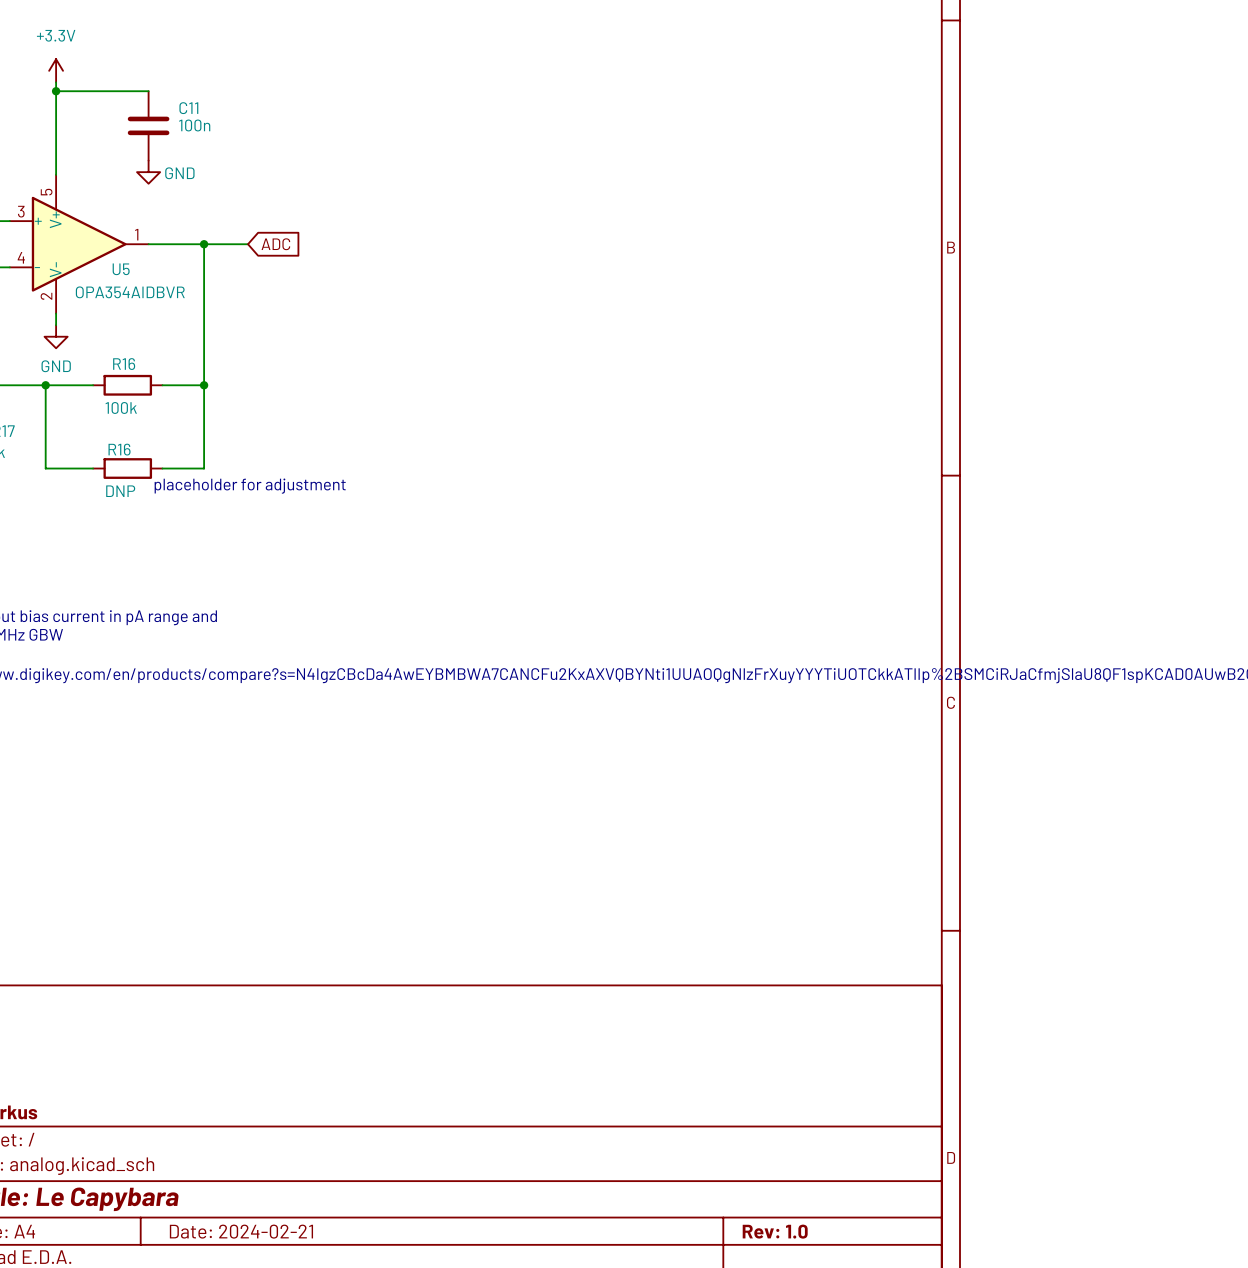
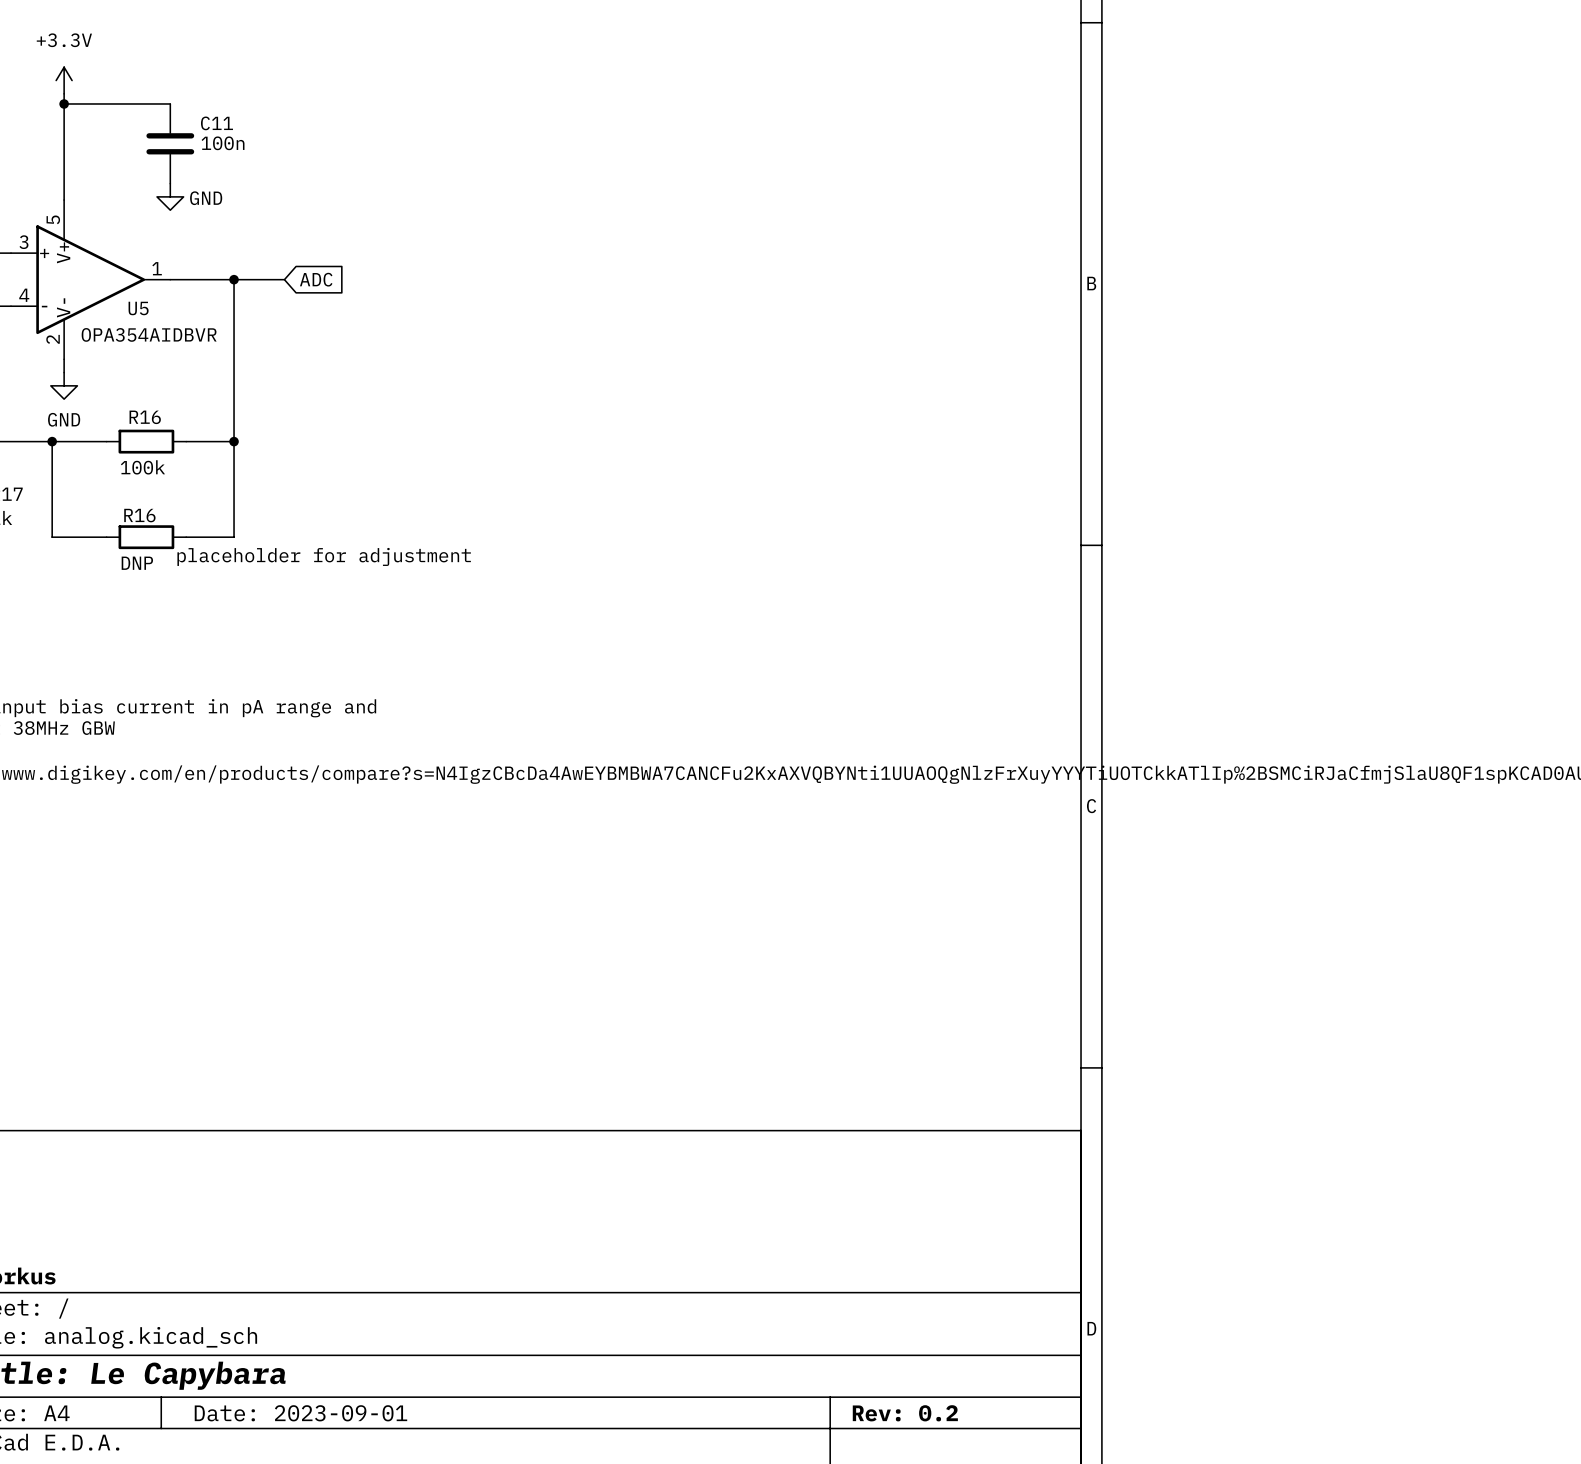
title block: Date: 2024-02-21 (241, 1231) -> Date: 2023-09-01 (300, 1413)
title block: Rev: 1.0 (775, 1231) -> Rev: 0.2 (905, 1413)

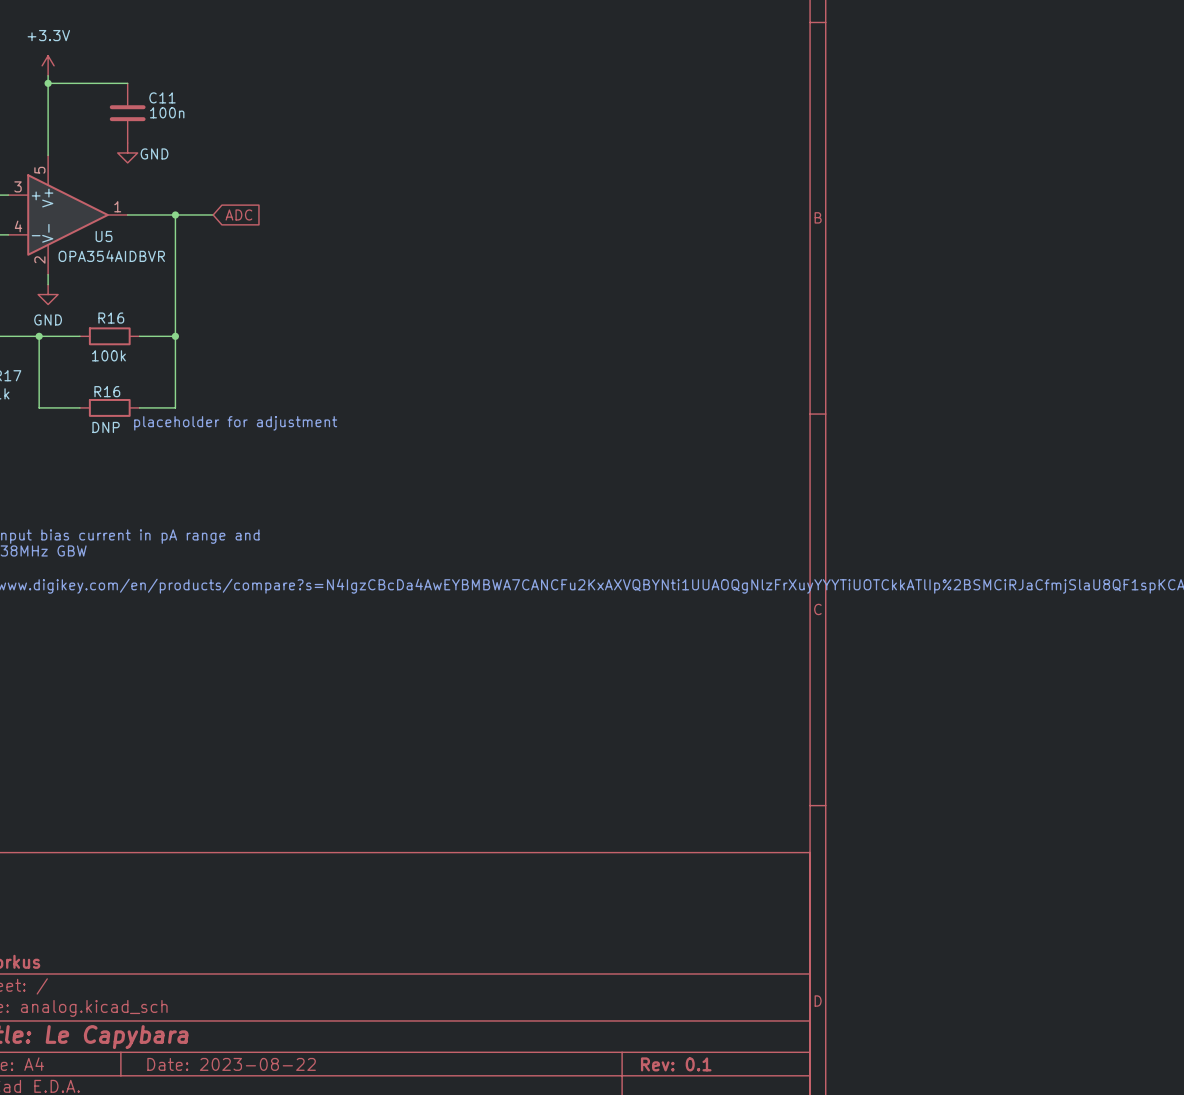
title block: Date: 2023-09-01 (300, 1413) -> Date: 2023-08-22 (231, 1064)
title block: Rev: 0.2 (905, 1413) -> Rev: 0.1 (676, 1064)

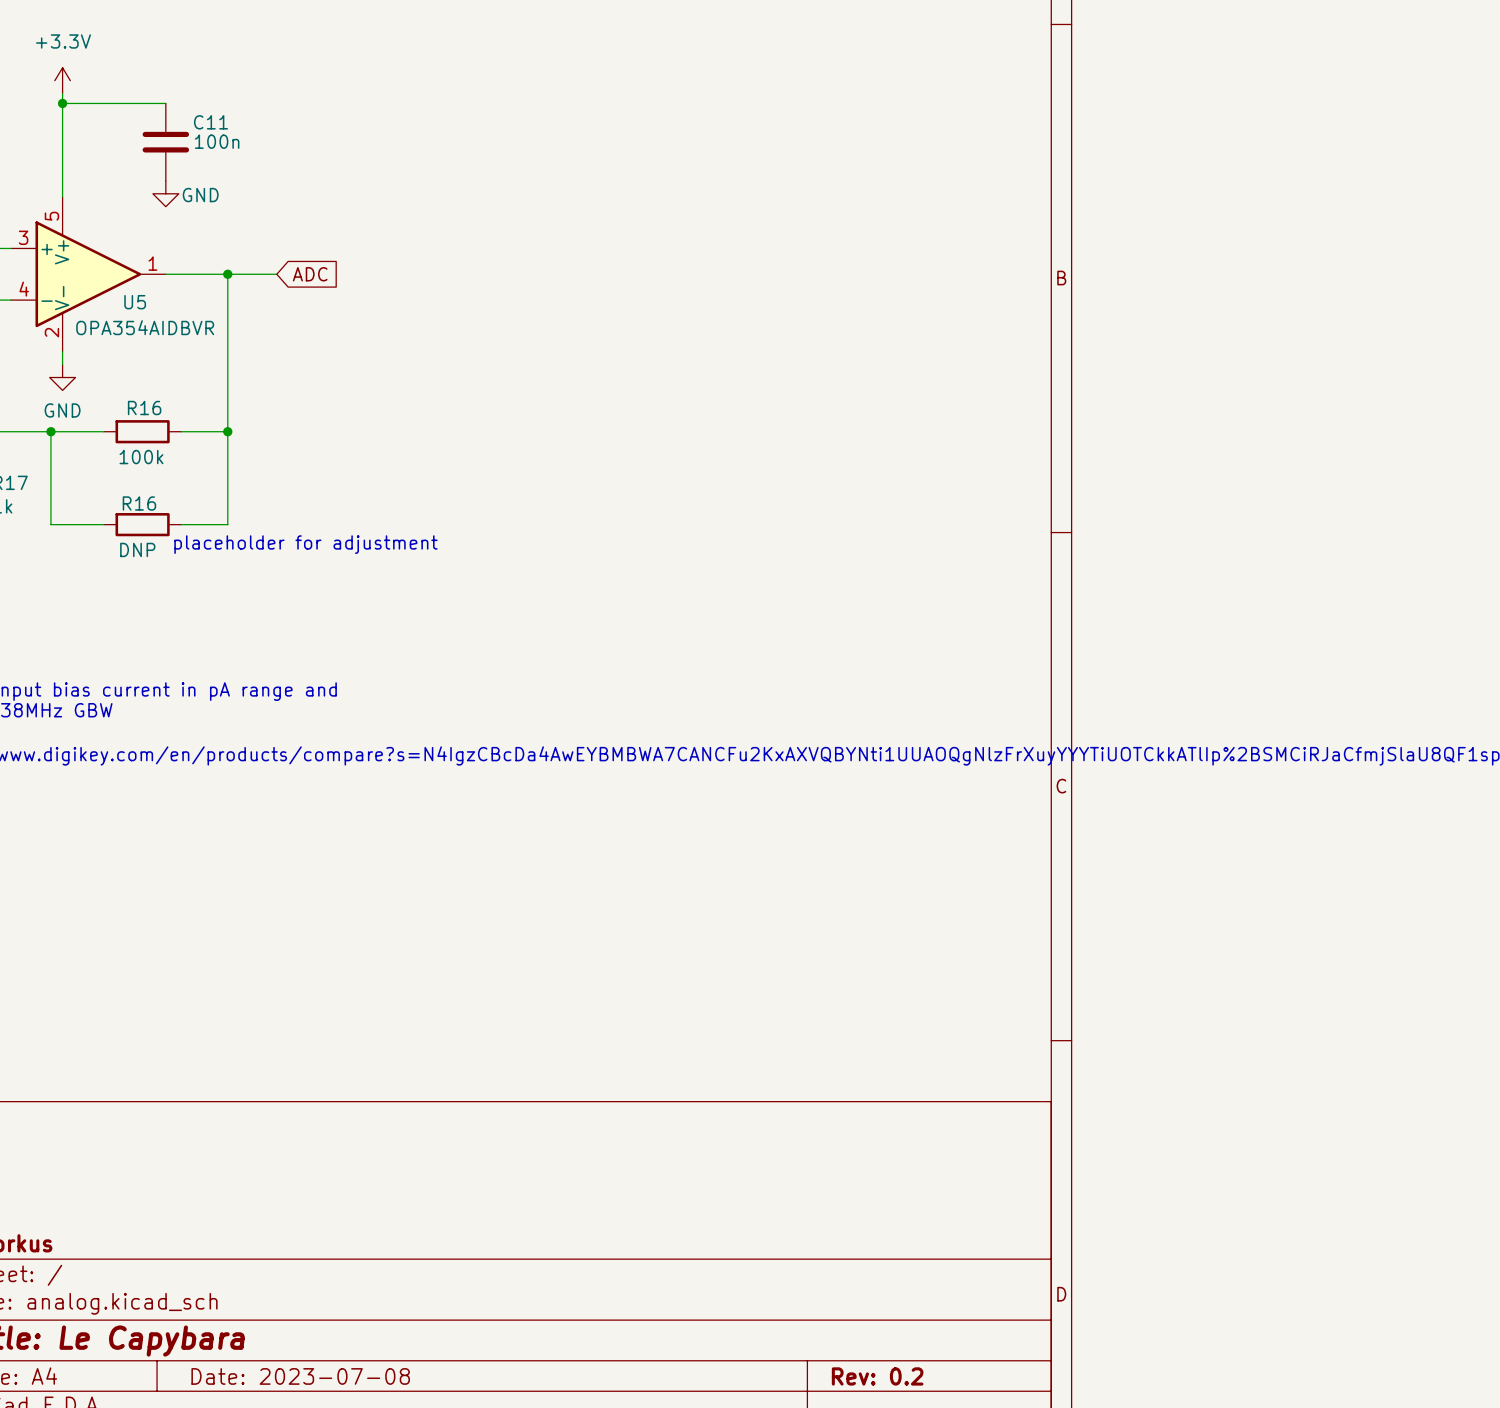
title block: Date: 2023-08-22 (231, 1064) -> Date: 2023-07-08 (300, 1376)
title block: Rev: 0.1 (676, 1064) -> Rev: 0.2 (877, 1376)

